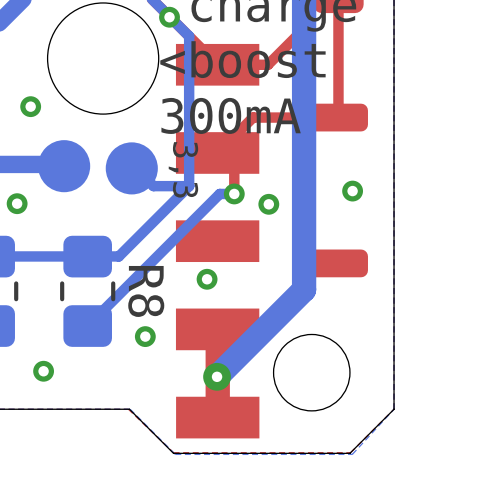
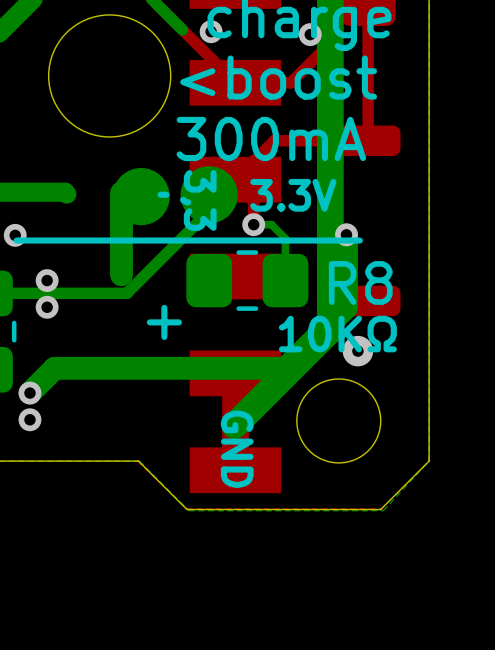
via position: (169, 17) -> (211, 31)
bottom track: (170, 17) (189, 36) (189, 186) (153, 186) (133, 166) -> none
via: none -> (310, 34)
via: (30, 106) -> none
bottom track: none -> (121, 192) (121, 274)
part position: (64, 166) -> (209, 194)
line: none -> (166, 194) (160, 194)
text: none -> 3.3V (293, 195)
via: (352, 191) -> none
bottom track: (234, 193) (219, 193) (87, 326) -> (253, 224) (271, 224) (285, 238) (285, 272)
bottom track: none -> (346, 234) (346, 307) (285, 368) (54, 368) (29, 393)
via: none -> (346, 234)
via: (268, 204) -> none
line: none -> (359, 240) (16, 240)
via: none -> (47, 280)
via: none -> (47, 307)
via: (207, 279) -> none
text: none -> + (164, 322)
R8 rotation: 0° (87, 291) -> 90° clockwise (247, 280)
R8 position: (87, 291) -> (247, 280)
text: none -> 10KΩ (337, 334)
via: (145, 336) -> none
via: none -> (29, 393)
via position: (43, 371) -> (29, 419)
via position: (217, 376) -> (357, 351)
text: none -> GND (237, 449)

